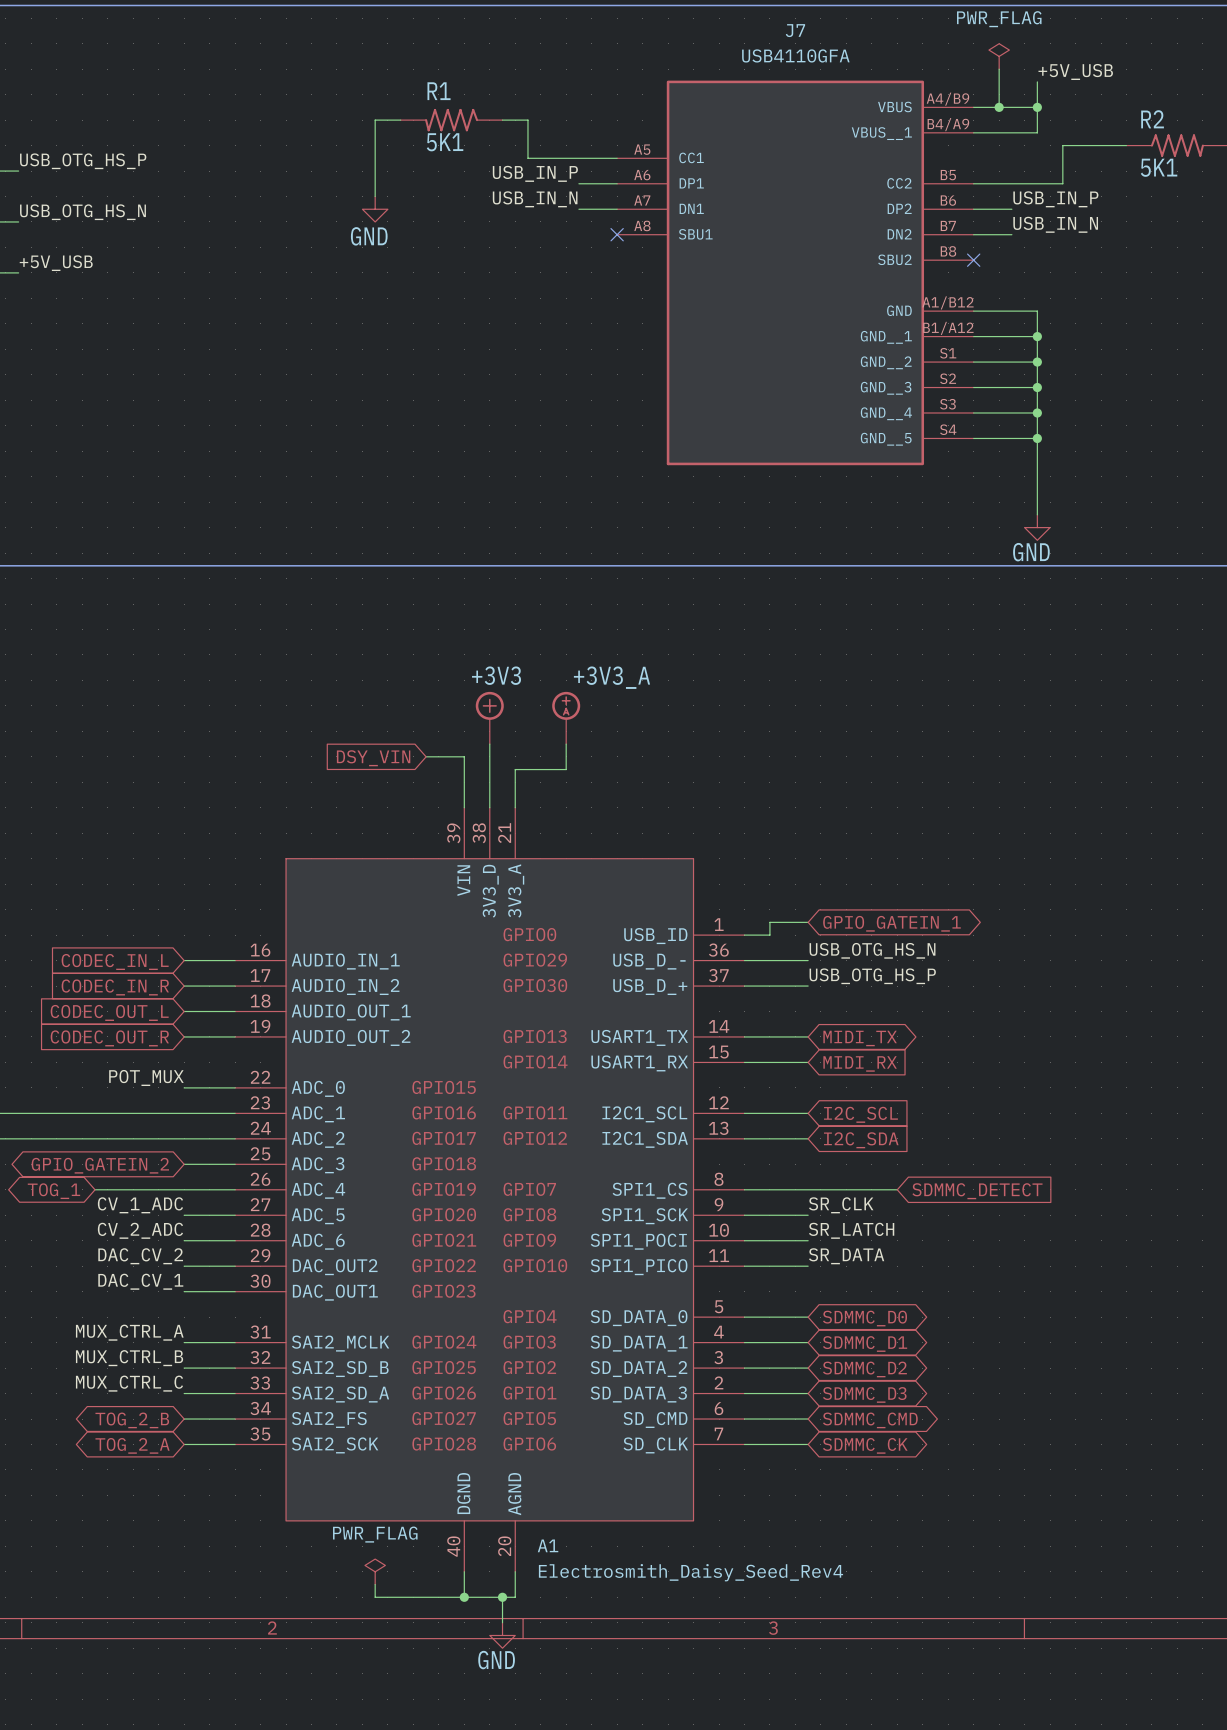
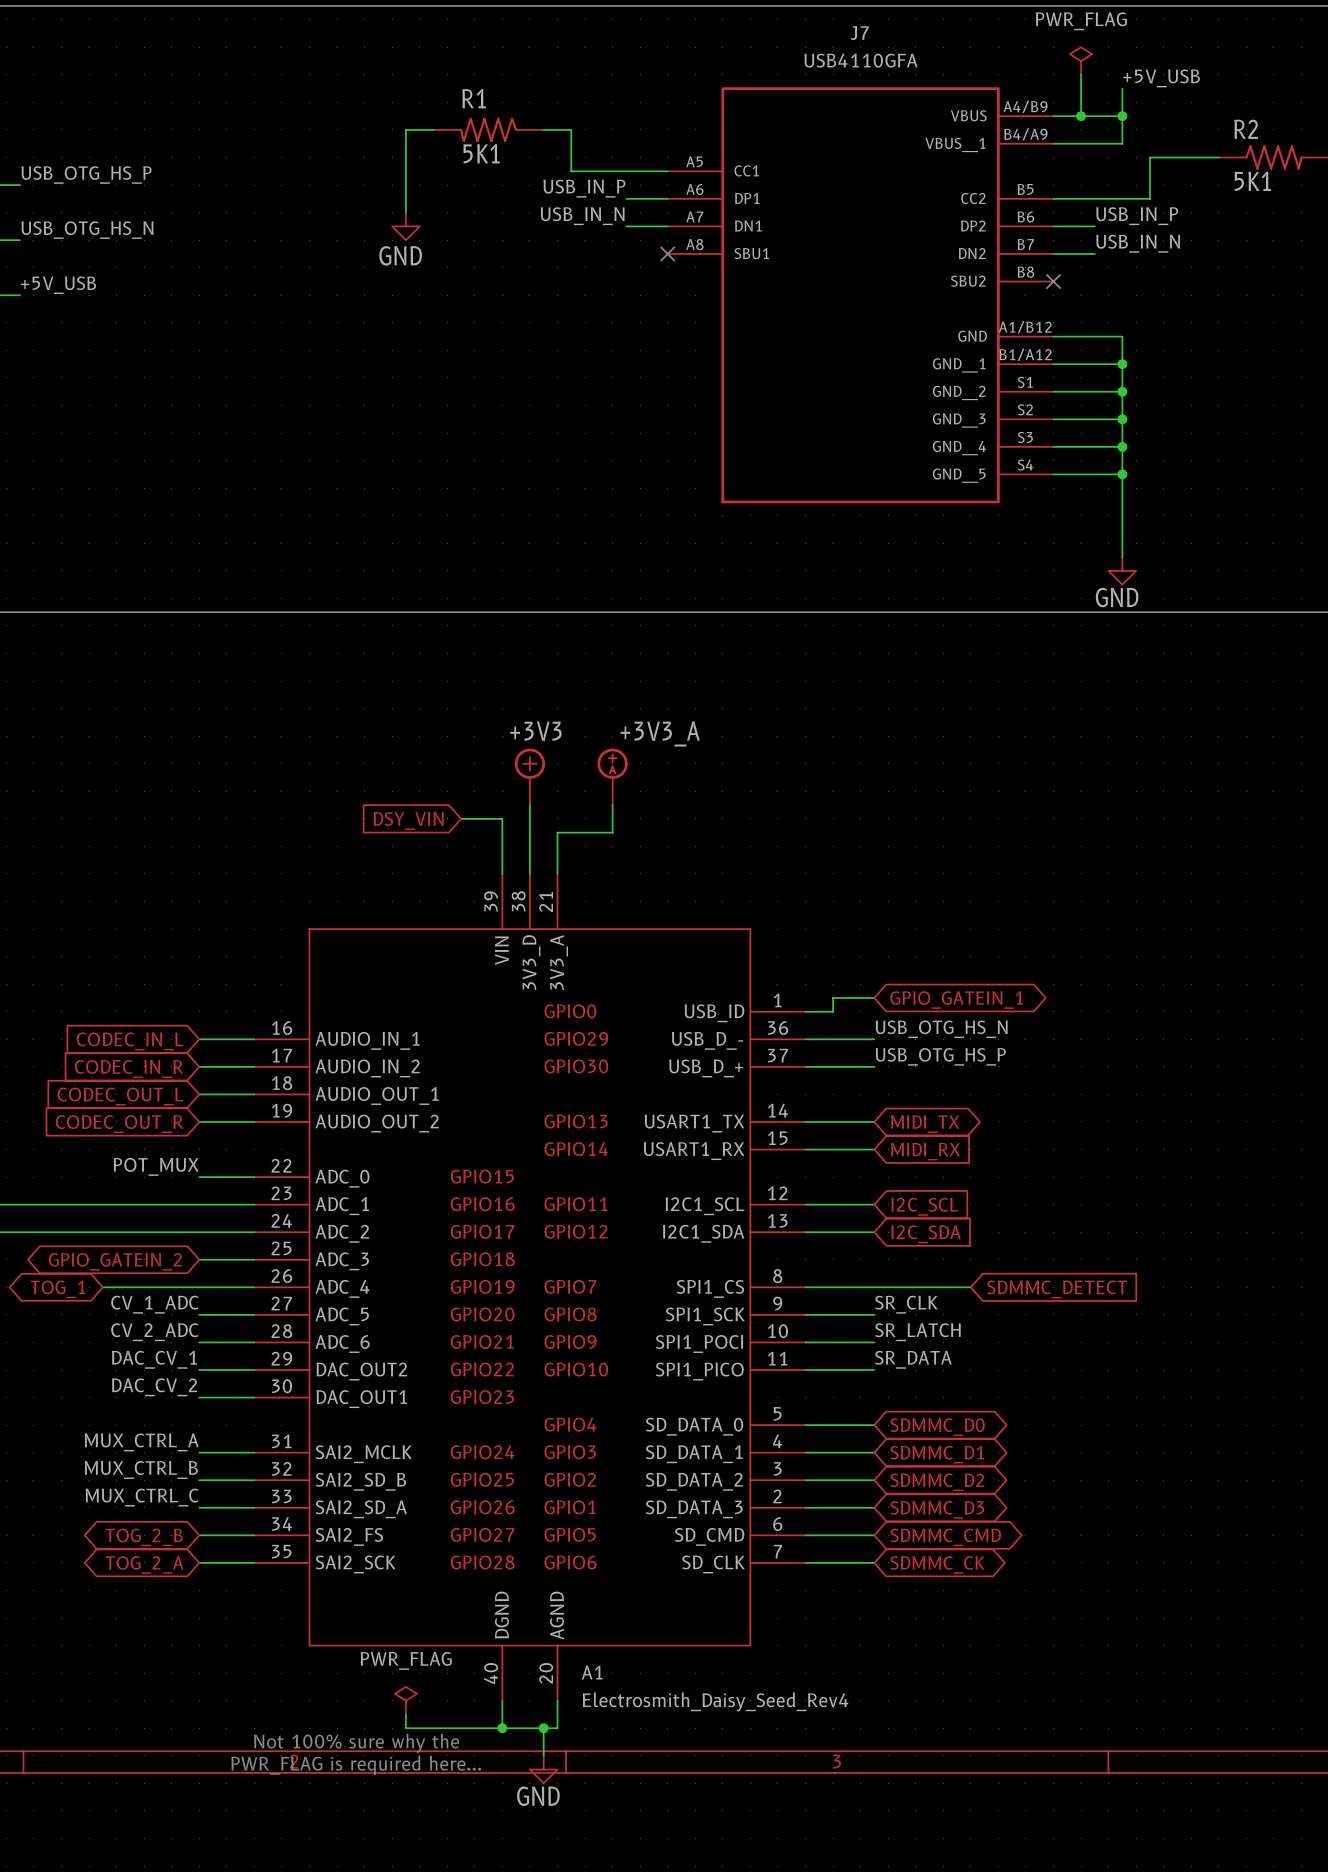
label: DAC_CV_2 (140, 1256) -> DAC_CV_1 (154, 1359)
label: DAC_CV_1 (140, 1281) -> DAC_CV_2 (154, 1387)
text: none -> Not 100% sure why the (356, 1743)
text: none -> PWR_FLAG is required here... (356, 1765)

